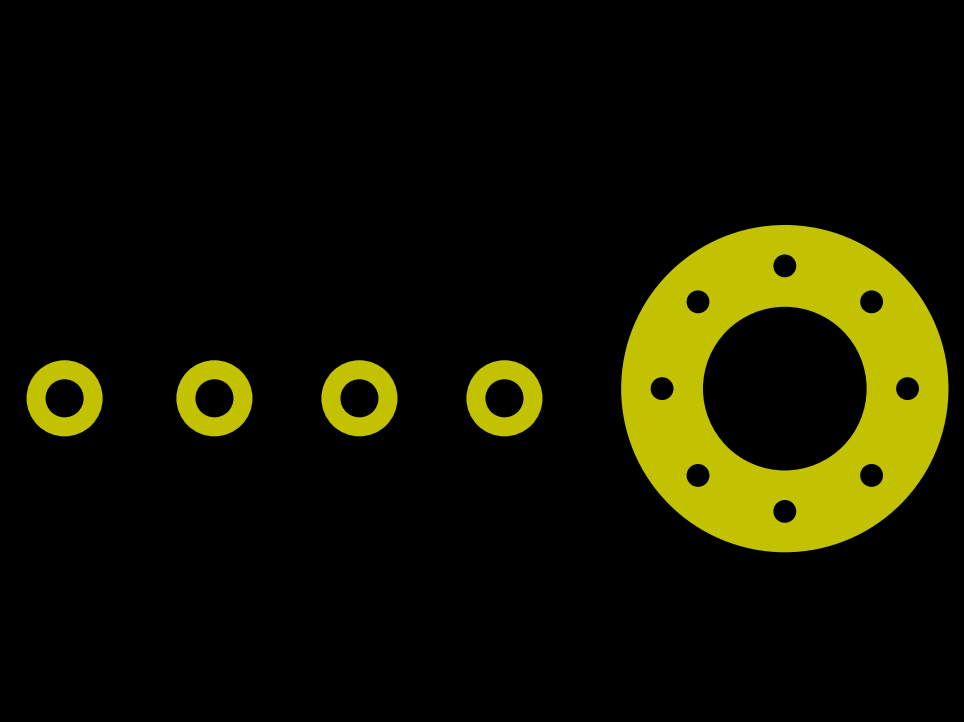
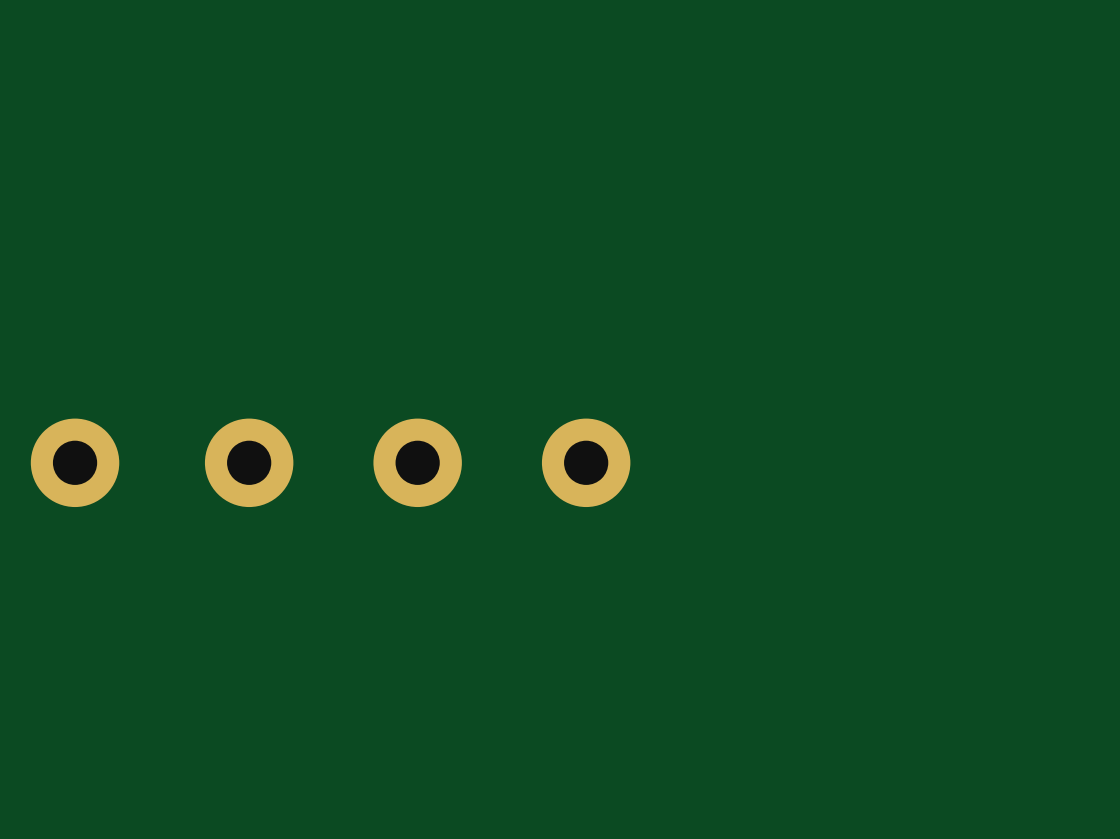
part: (784, 388) -> none

